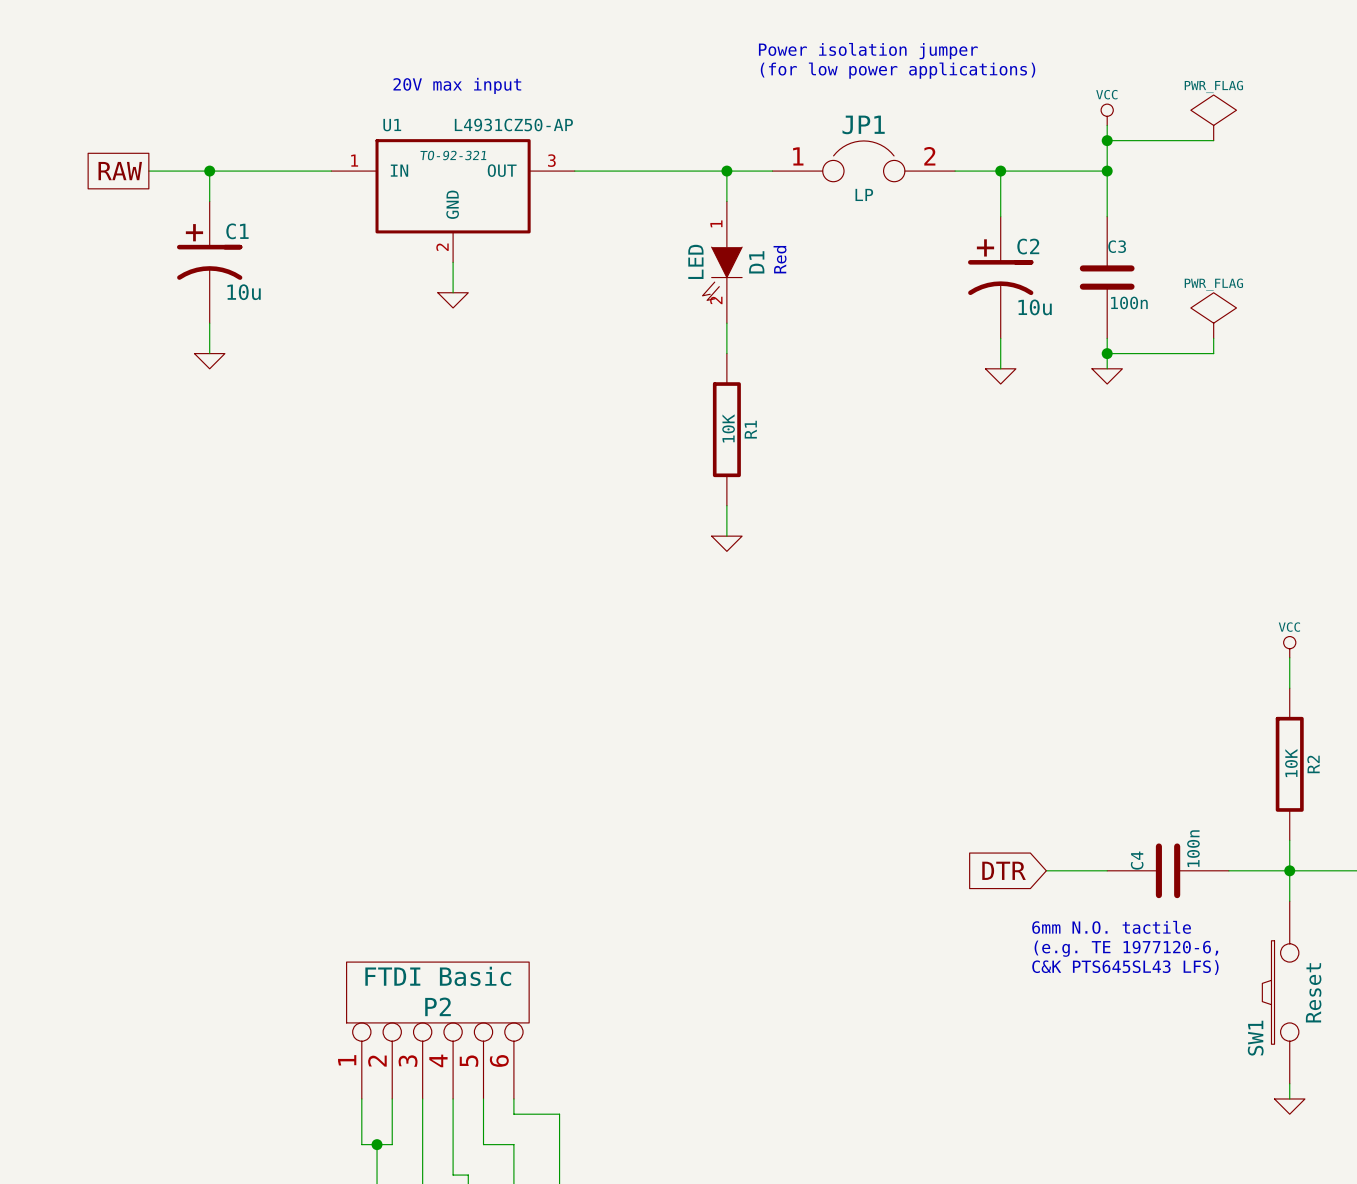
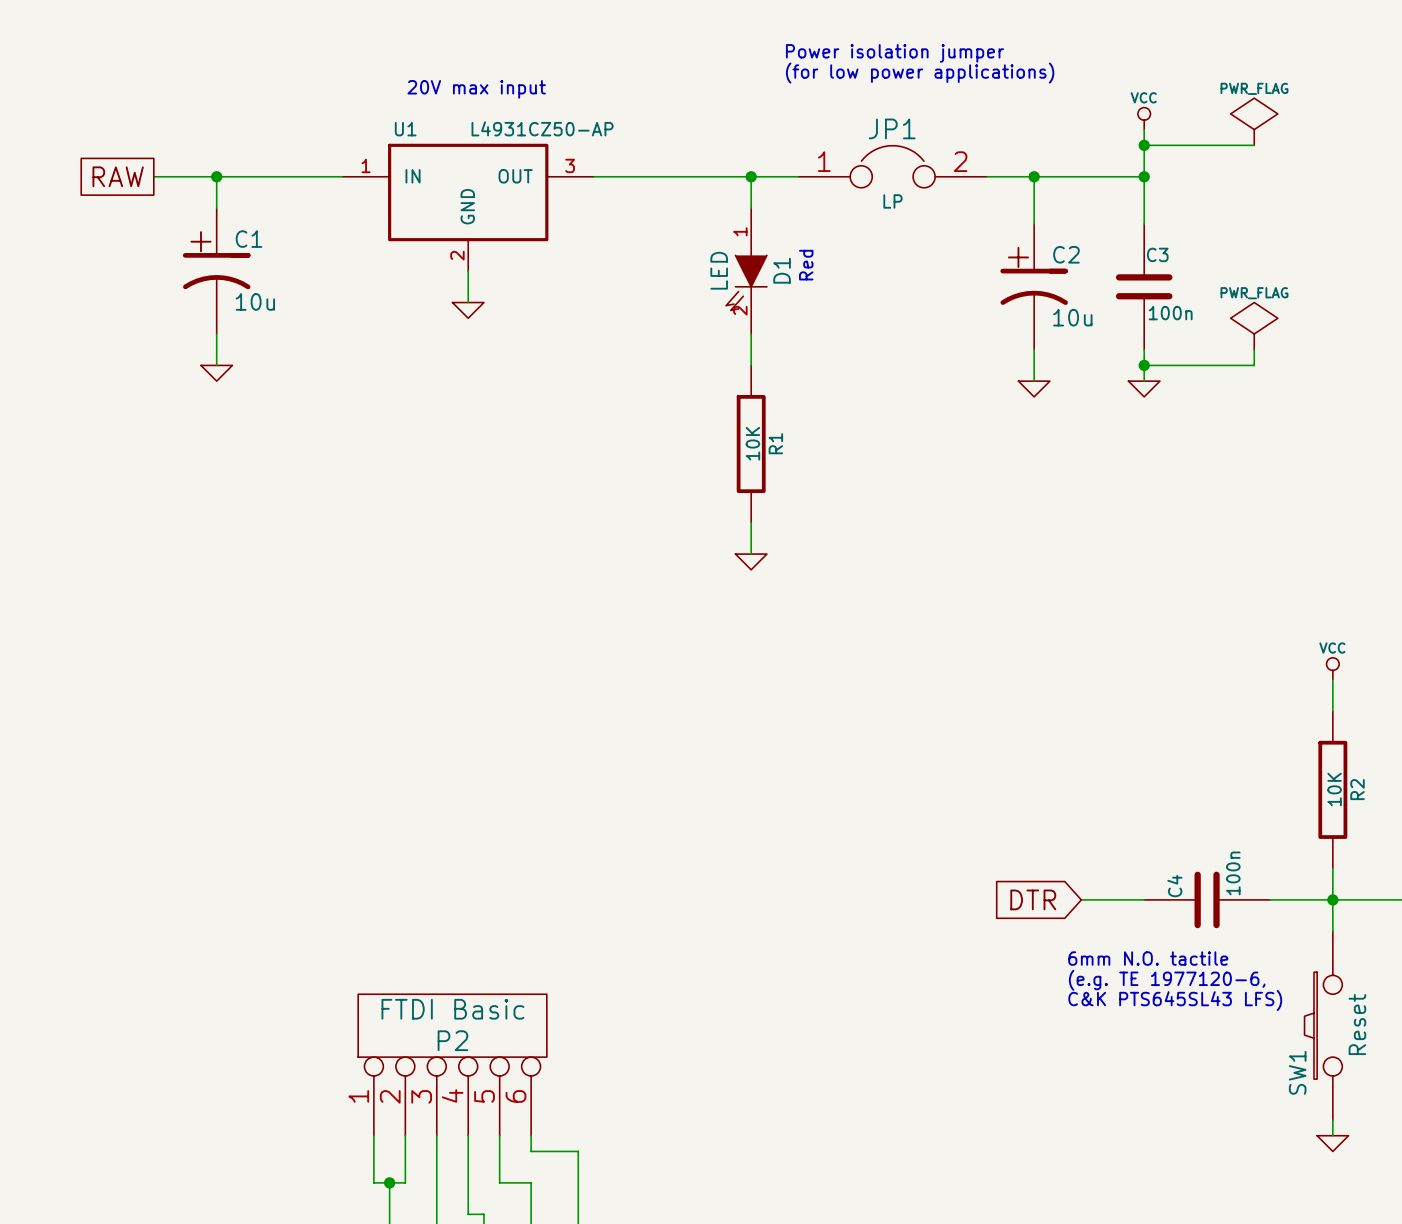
U1 text: TO-92-321 (453, 155) -> none

